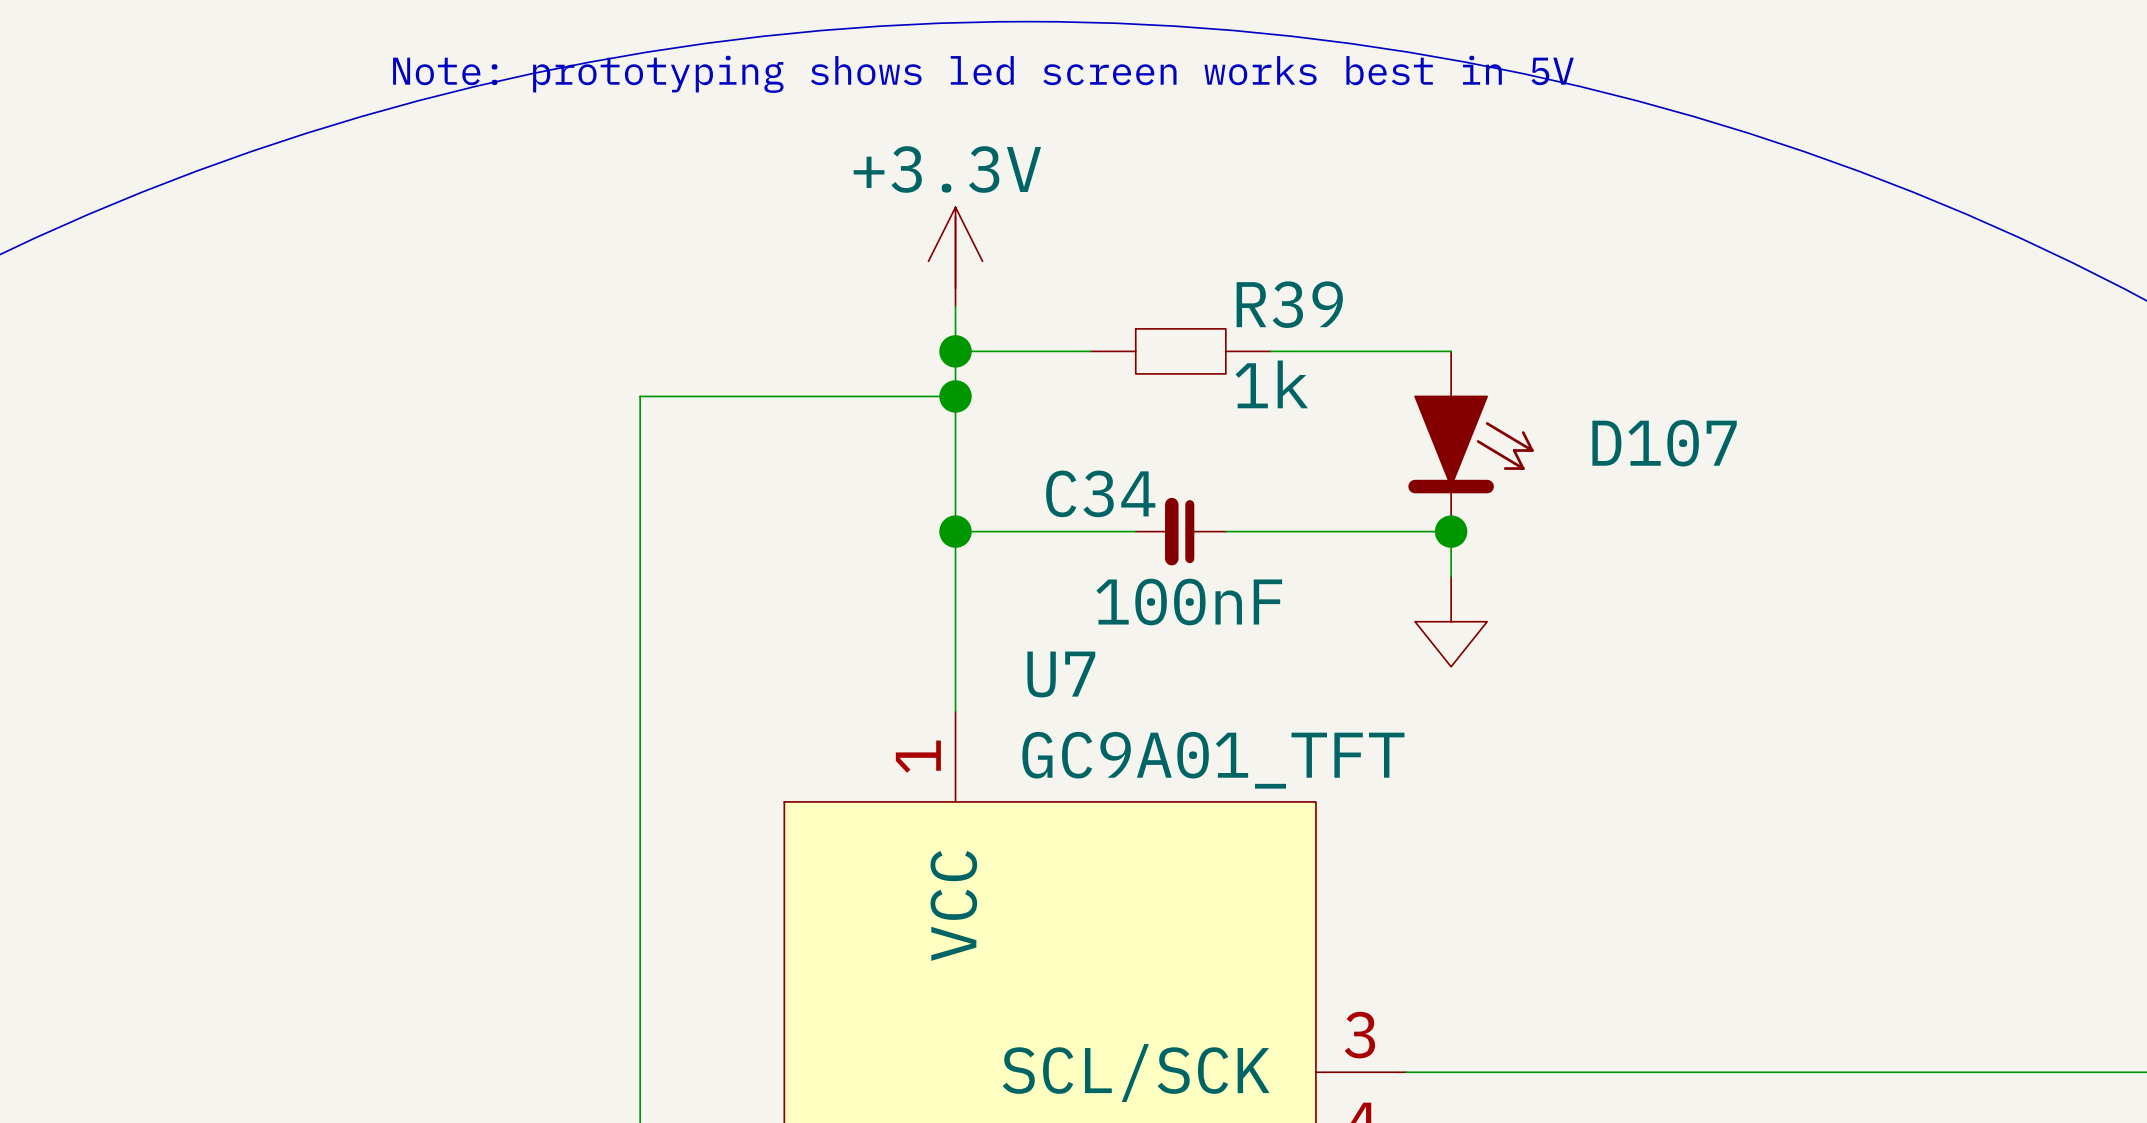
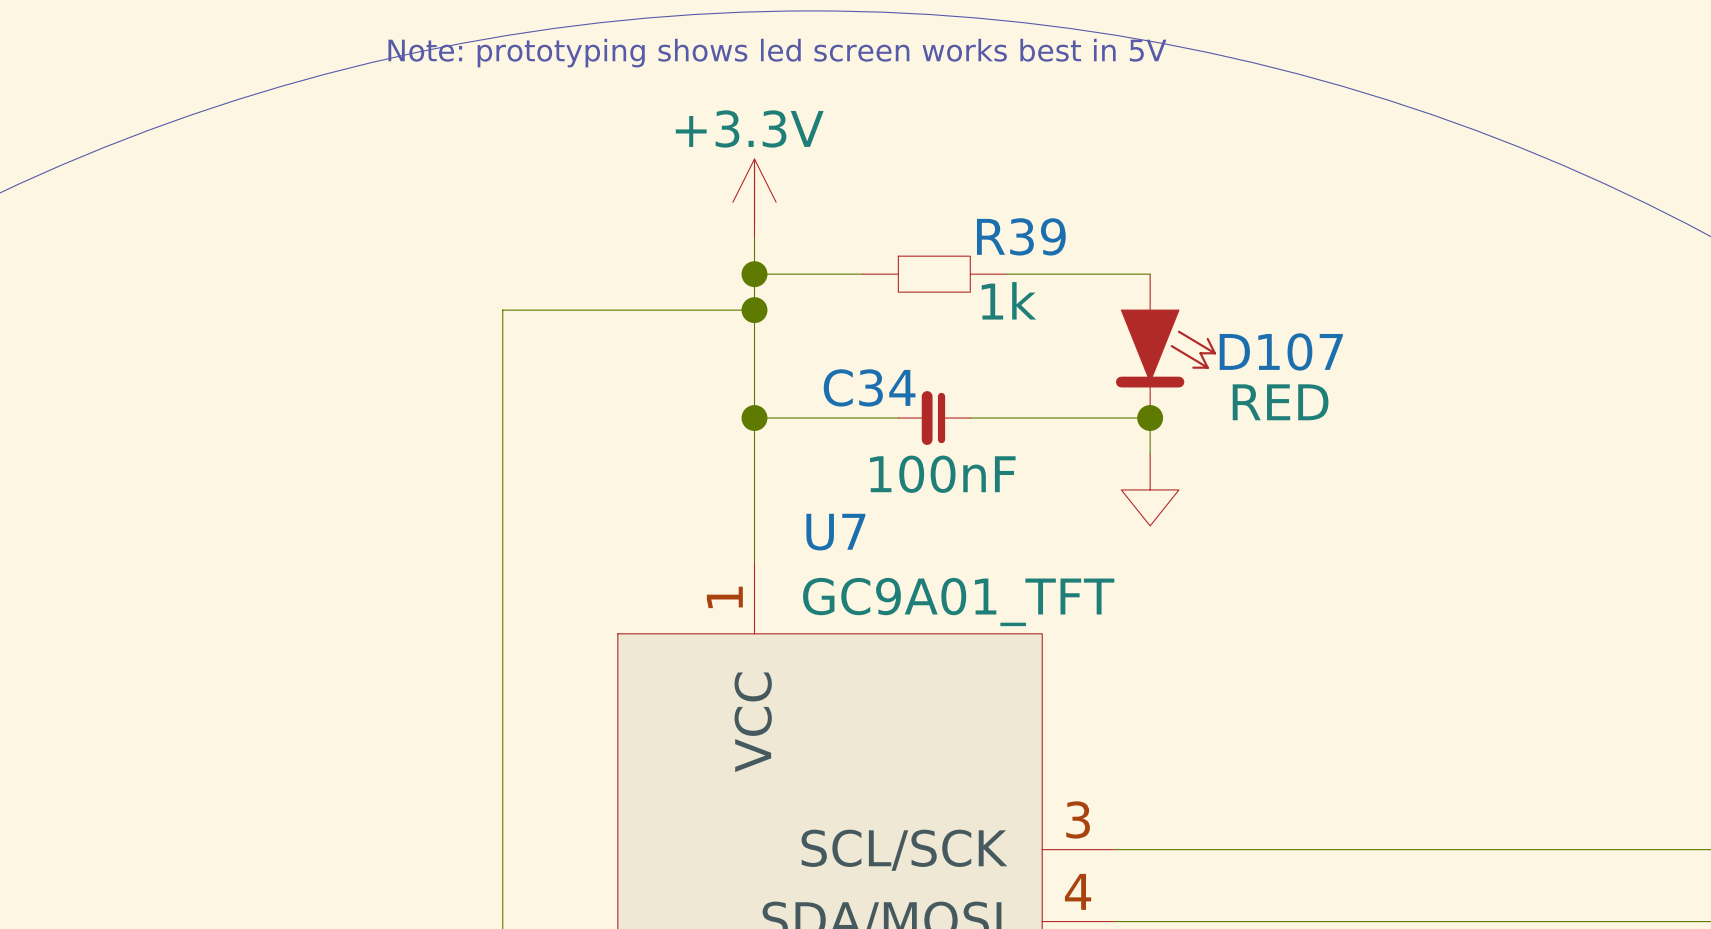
D107 name position: D107 (1664, 443) -> D107 (1281, 351)
D107 value: none -> RED (1280, 402)

